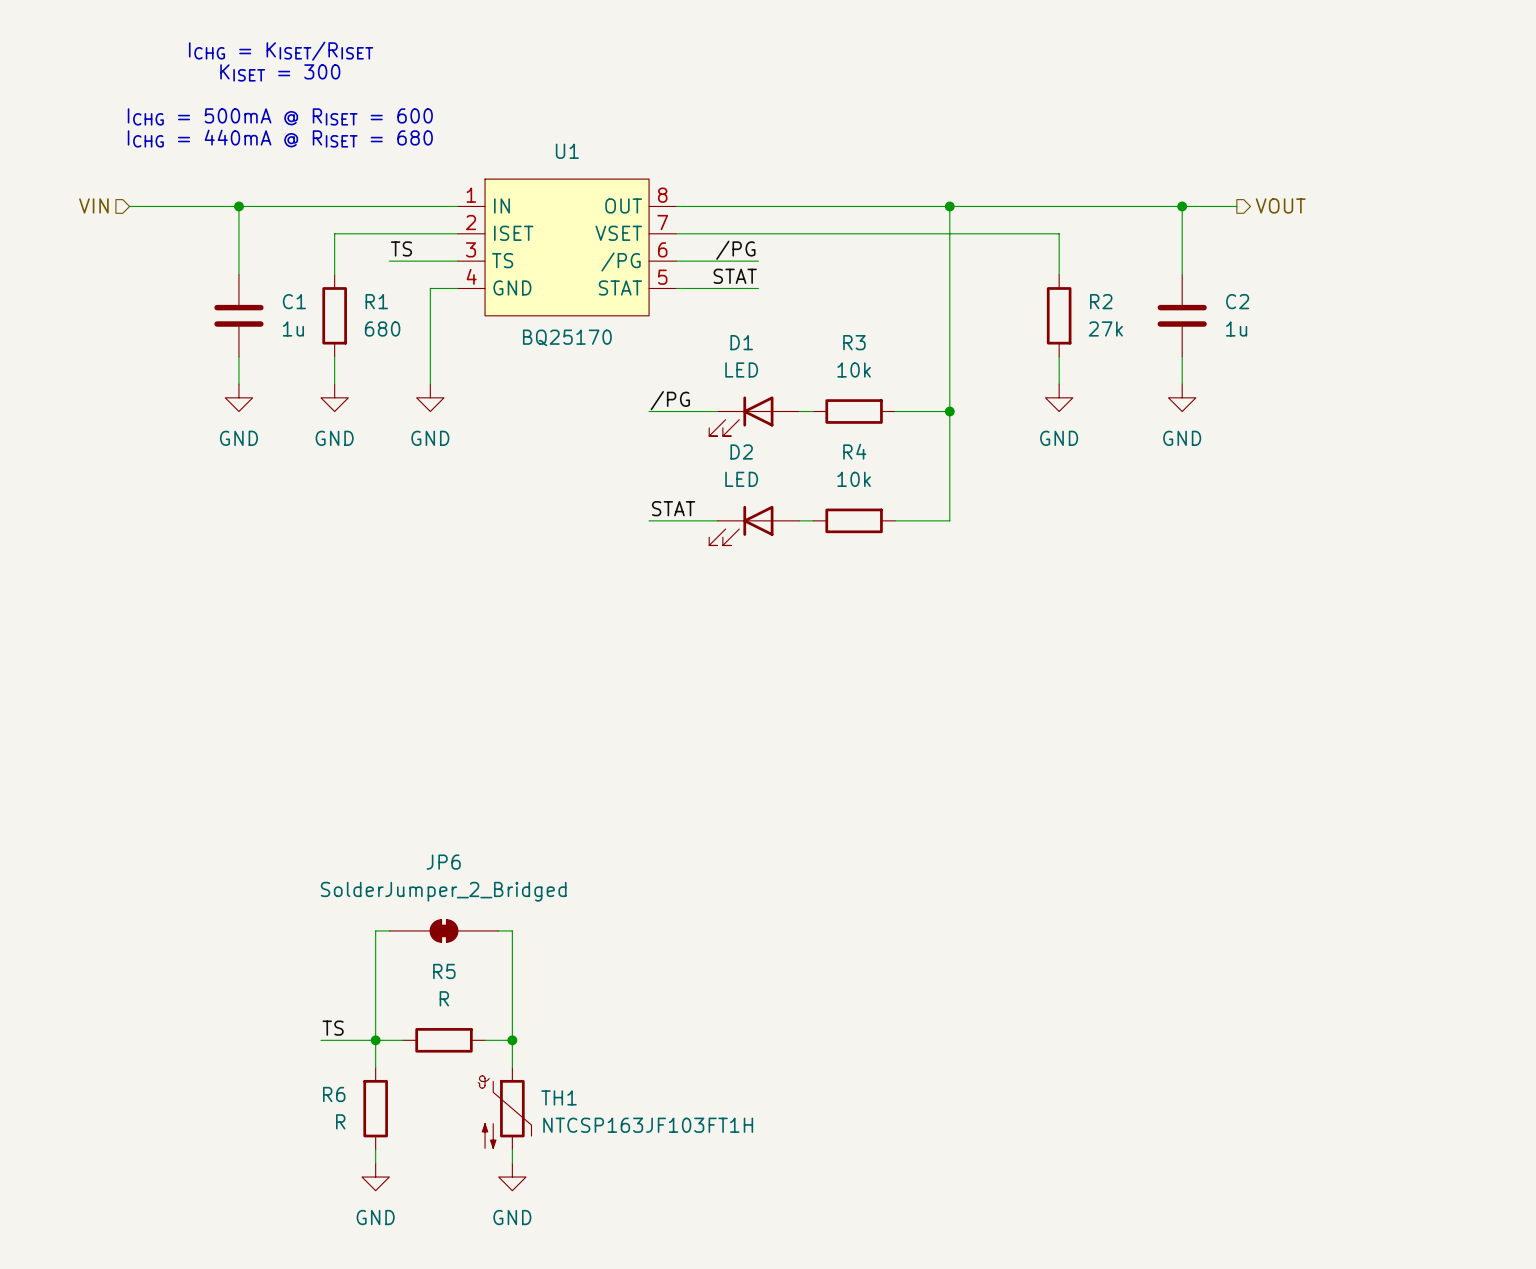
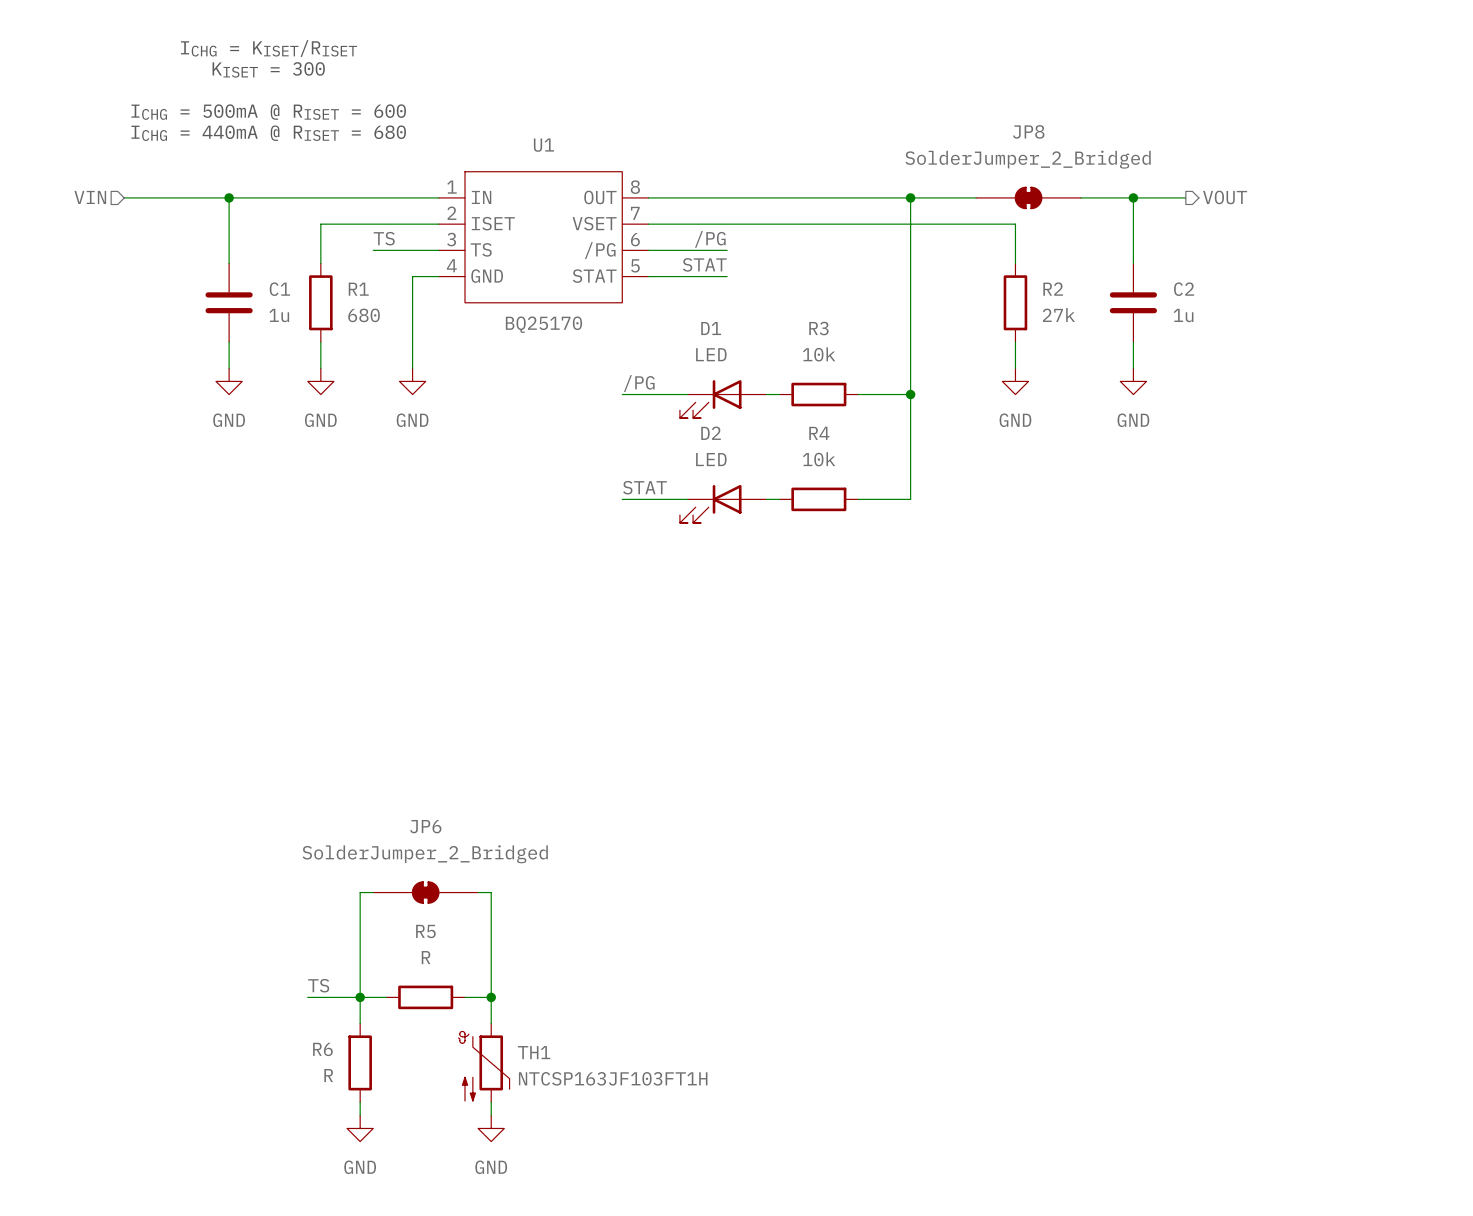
JP8: none -> SolderJumper_2_Bridged (1028, 197)

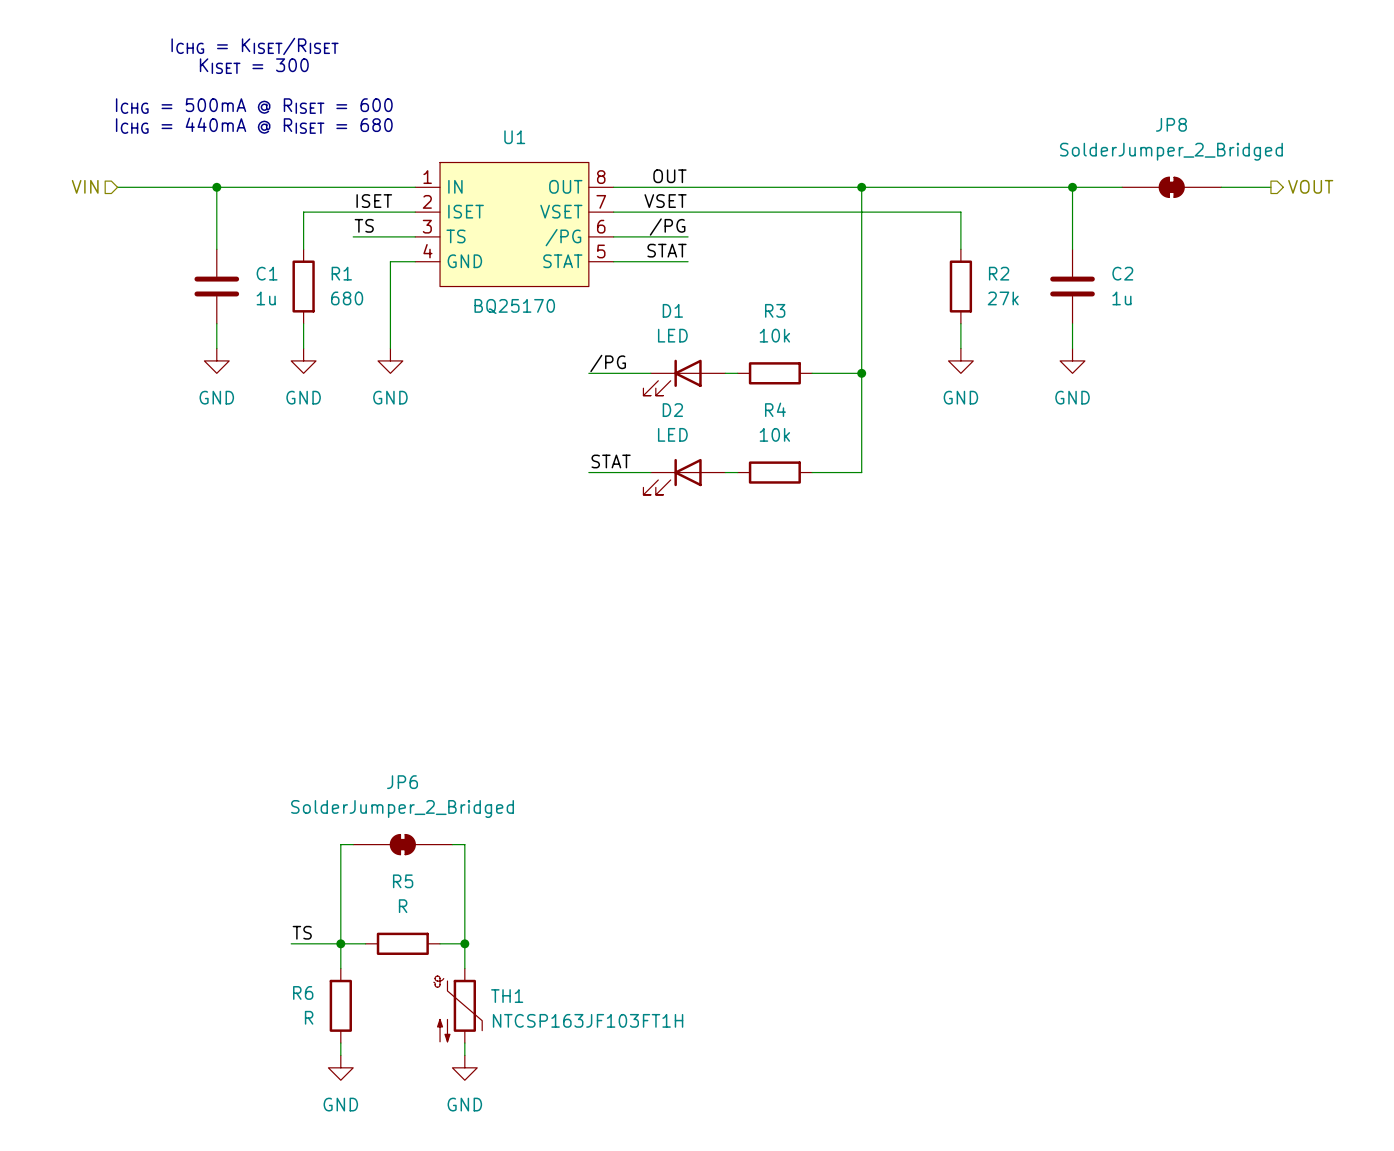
label: none -> OUT (669, 176)
JP8 position: (1028, 197) -> (1171, 187)
hierarchical label position: VOUT (1225, 197) -> VOUT (1310, 186)
wire: none -> (1221, 187) (1270, 187)
label: none -> ISET (374, 201)
label: none -> VSET (665, 201)

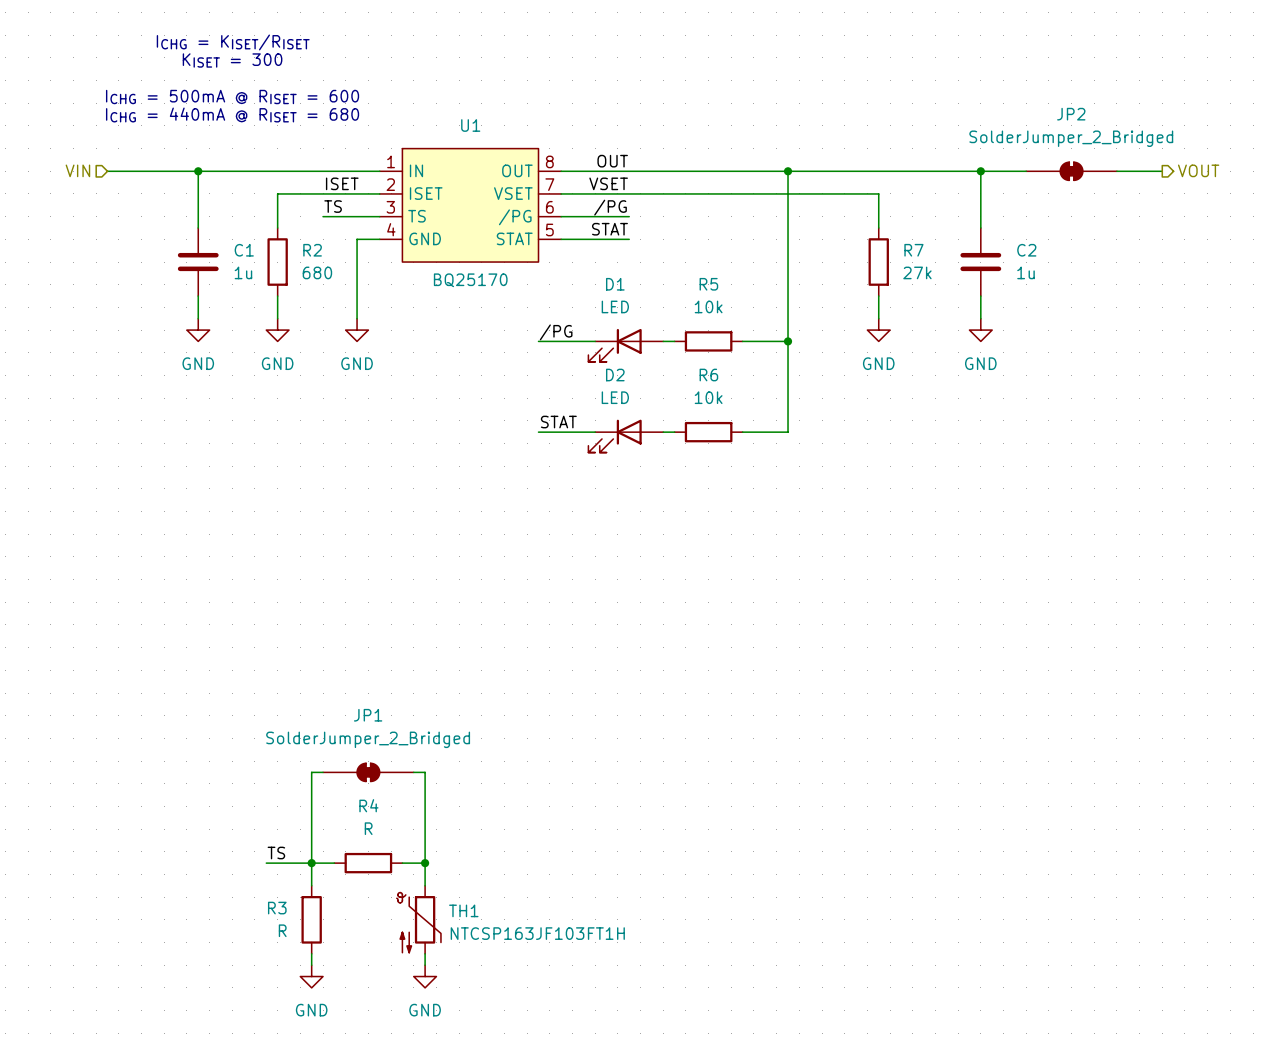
JP8 name: JP8 (1171, 124) -> JP2 (1071, 114)
R1 name: R1 (341, 273) -> R2 (312, 250)
R2 name: R2 (999, 273) -> R7 (913, 250)
R3 name: R3 (775, 310) -> R5 (708, 284)
R4 name: R4 (775, 409) -> R6 (708, 375)
JP6 name: JP6 (402, 782) -> JP1 (368, 715)
R5 name: R5 (403, 881) -> R4 (368, 805)
R6 name: R6 (303, 992) -> R3 (277, 908)

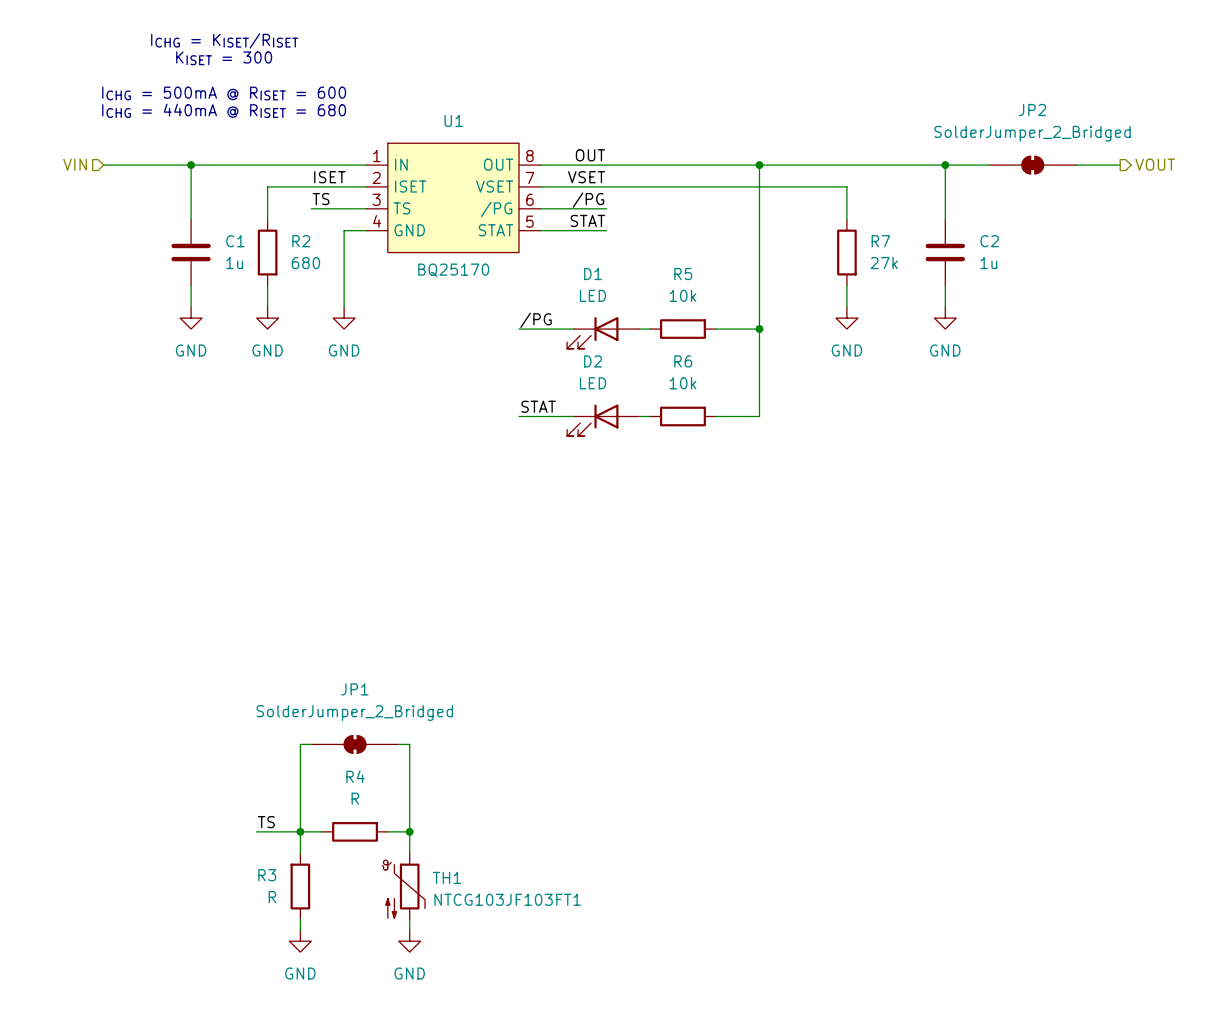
TH1 value: NTCSP163JF103FT1H (537, 933) -> NTCG103JF103FT1 (507, 899)

